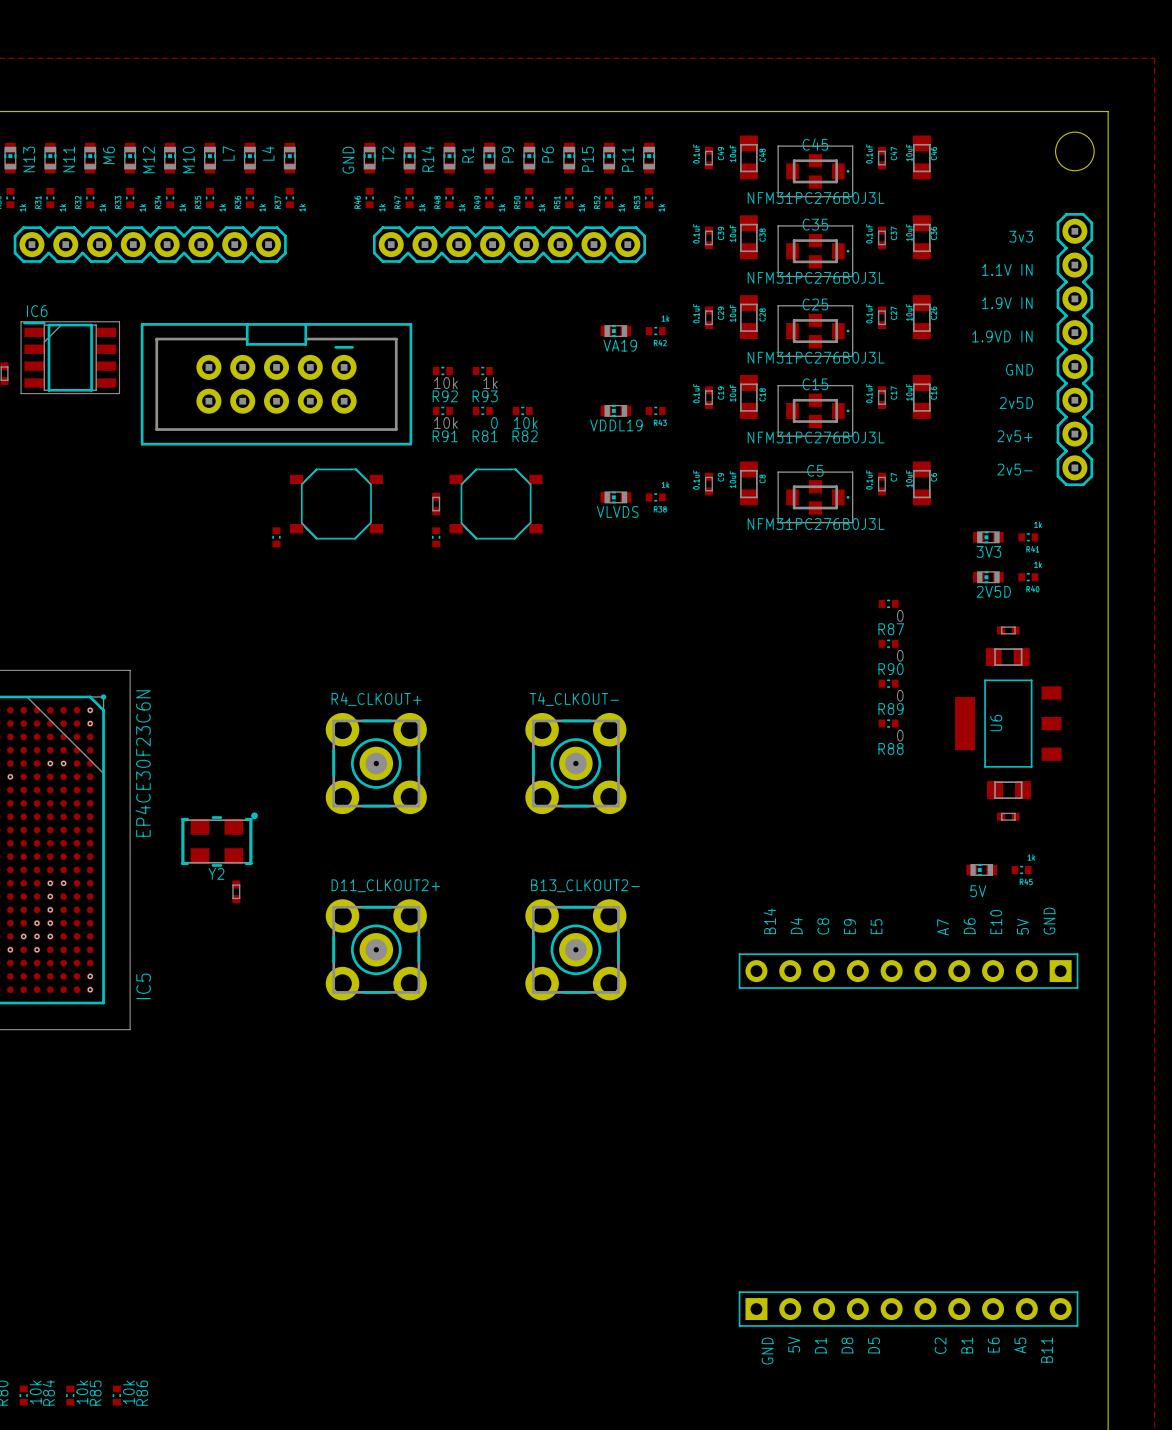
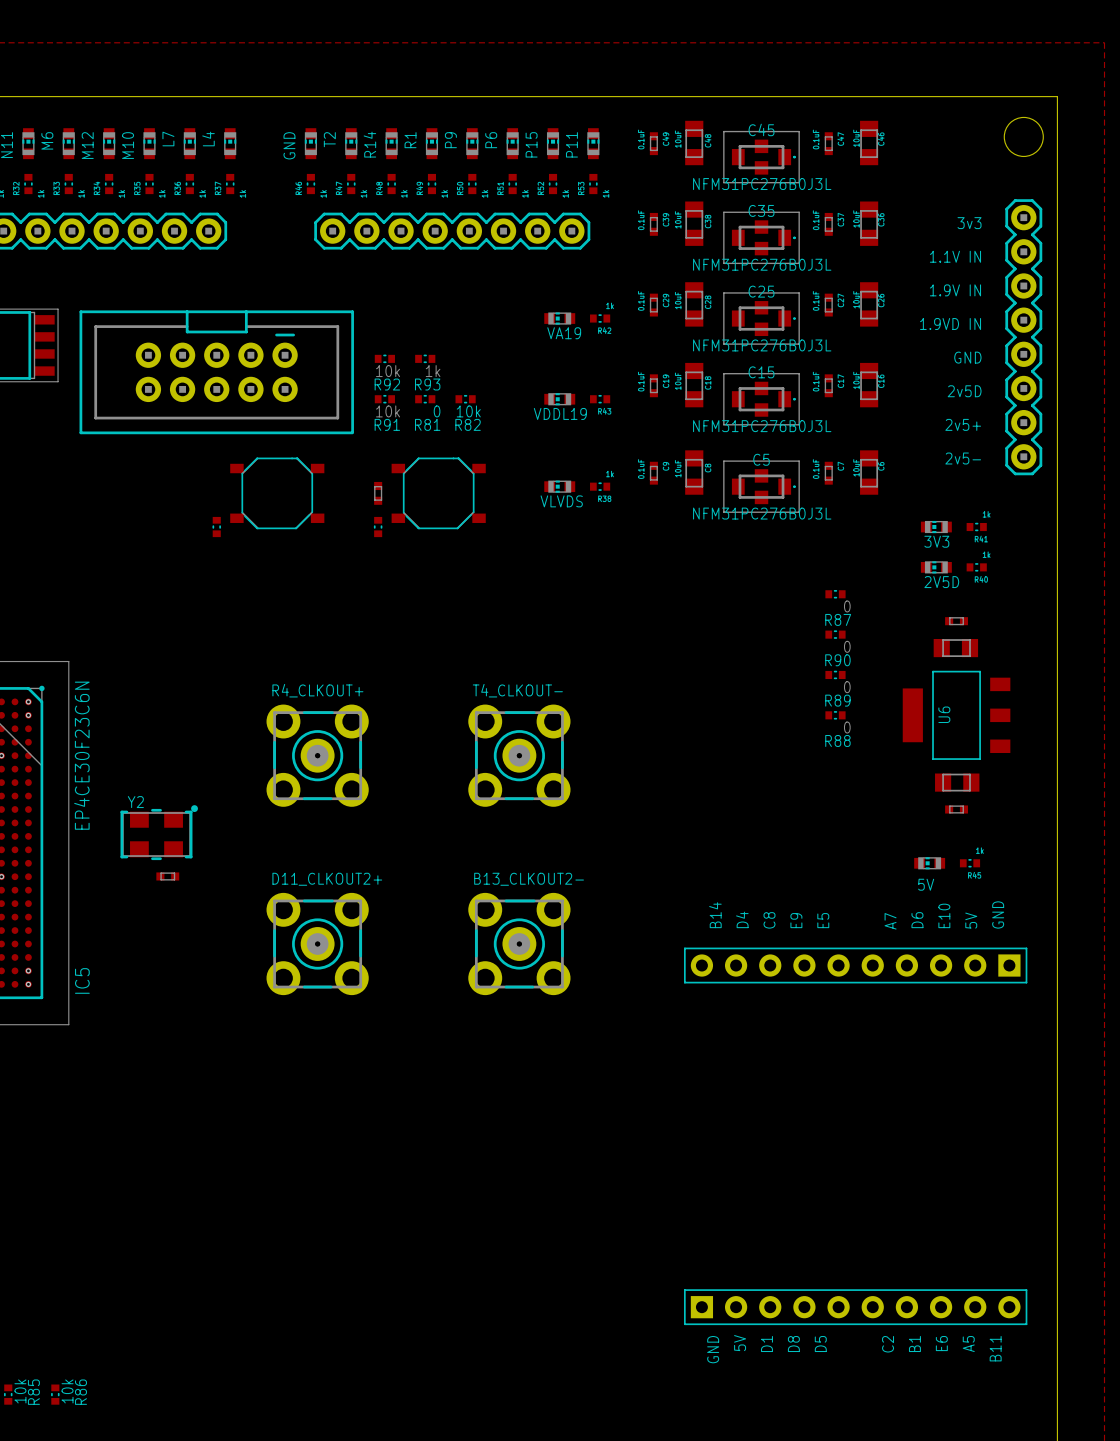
Y2 name position: Y2 (216, 873) -> Y2 (135, 802)
part rotation: 0° (236, 891) -> 90° clockwise (167, 876)

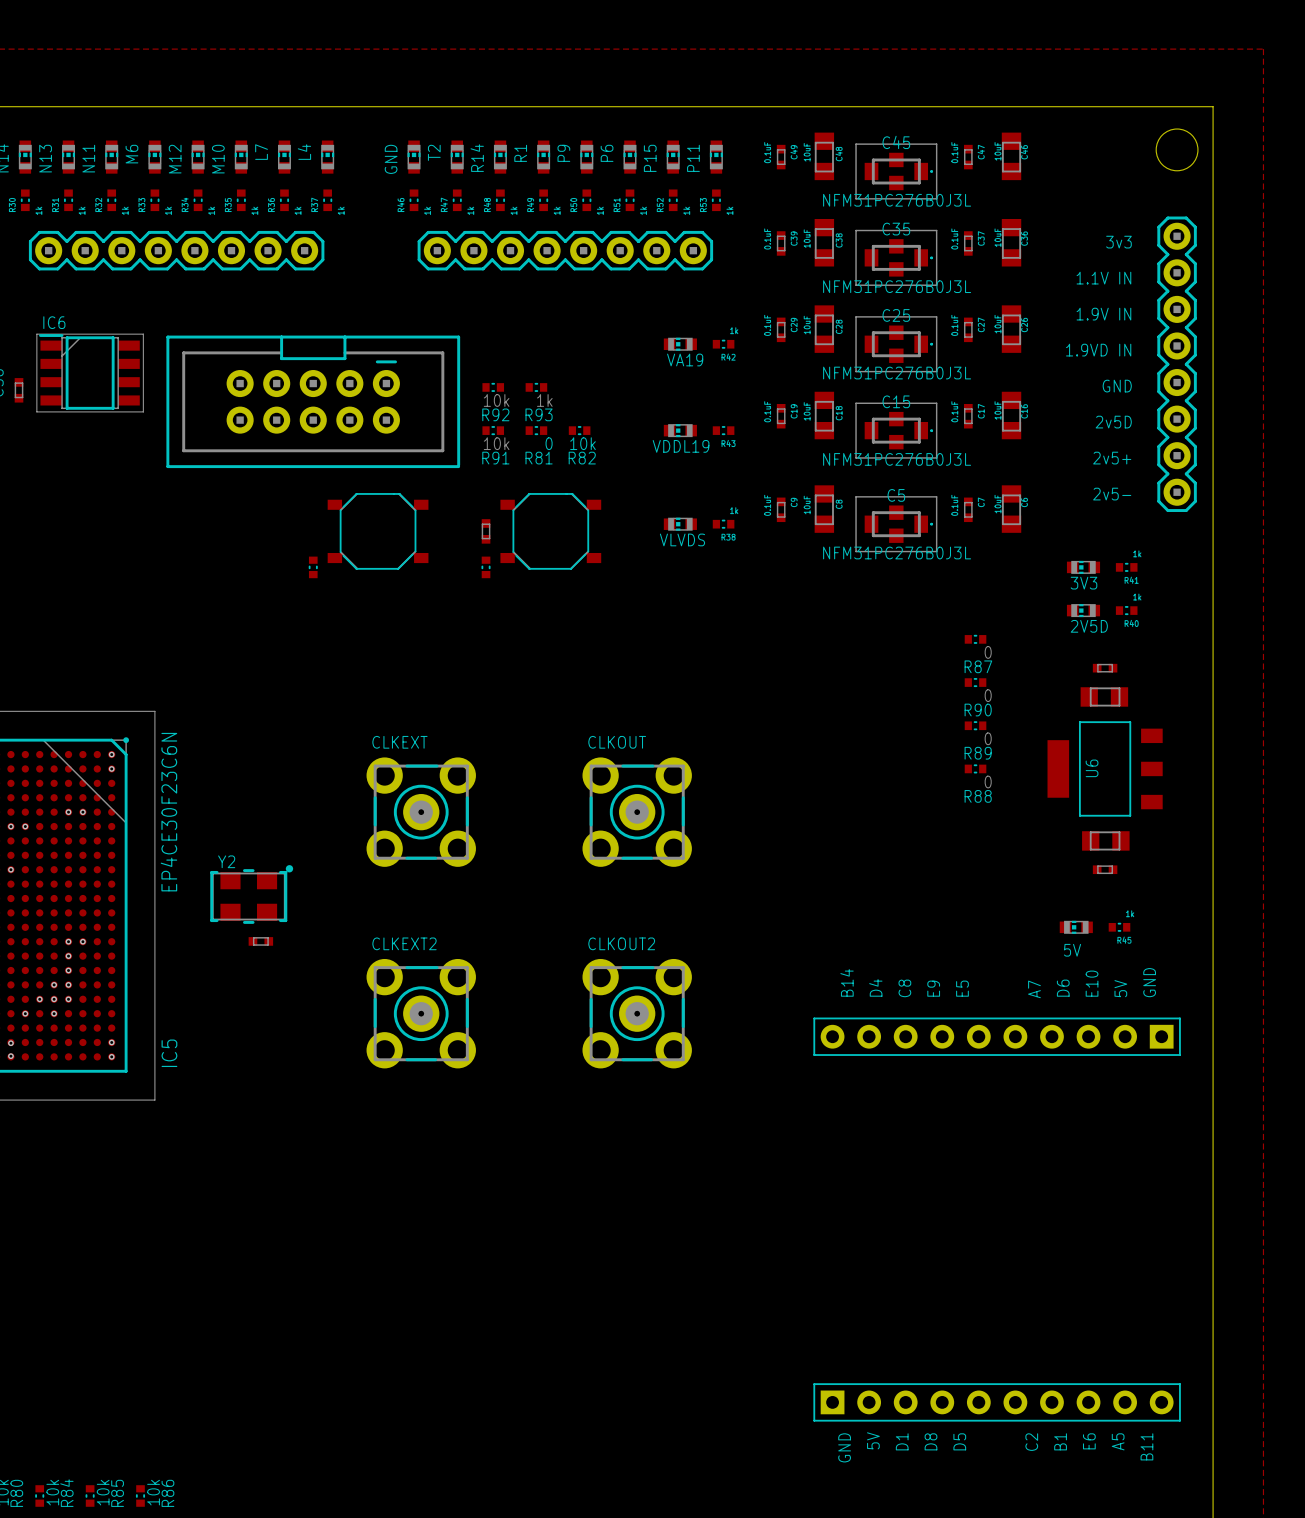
R4_CLKOUT+ name: R4_CLKOUT+ (317, 690) -> CLKEXT (399, 742)
T4_CLKOUT- name: T4_CLKOUT- (517, 690) -> CLKOUT (617, 742)
D11_CLKOUT2+ name: D11_CLKOUT2+ (327, 879) -> CLKEXT2 (404, 943)
B13_CLKOUT2- name: B13_CLKOUT2- (529, 879) -> CLKOUT2 (621, 943)

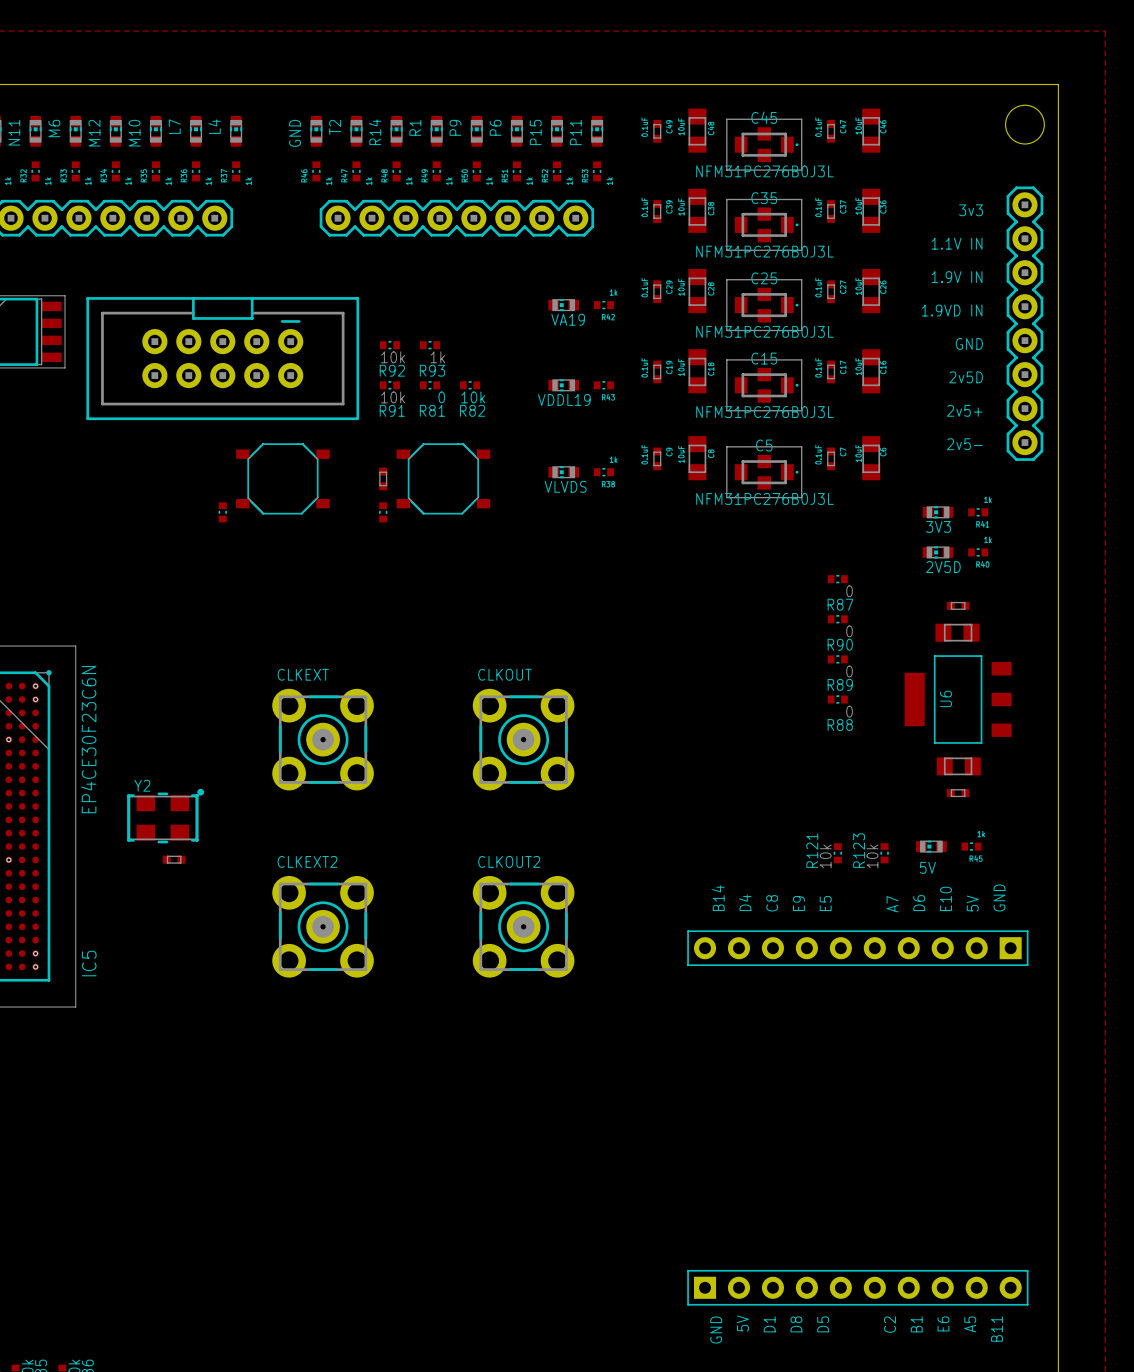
R121: none -> 10k (837, 853)
R123: none -> 10k (884, 853)

